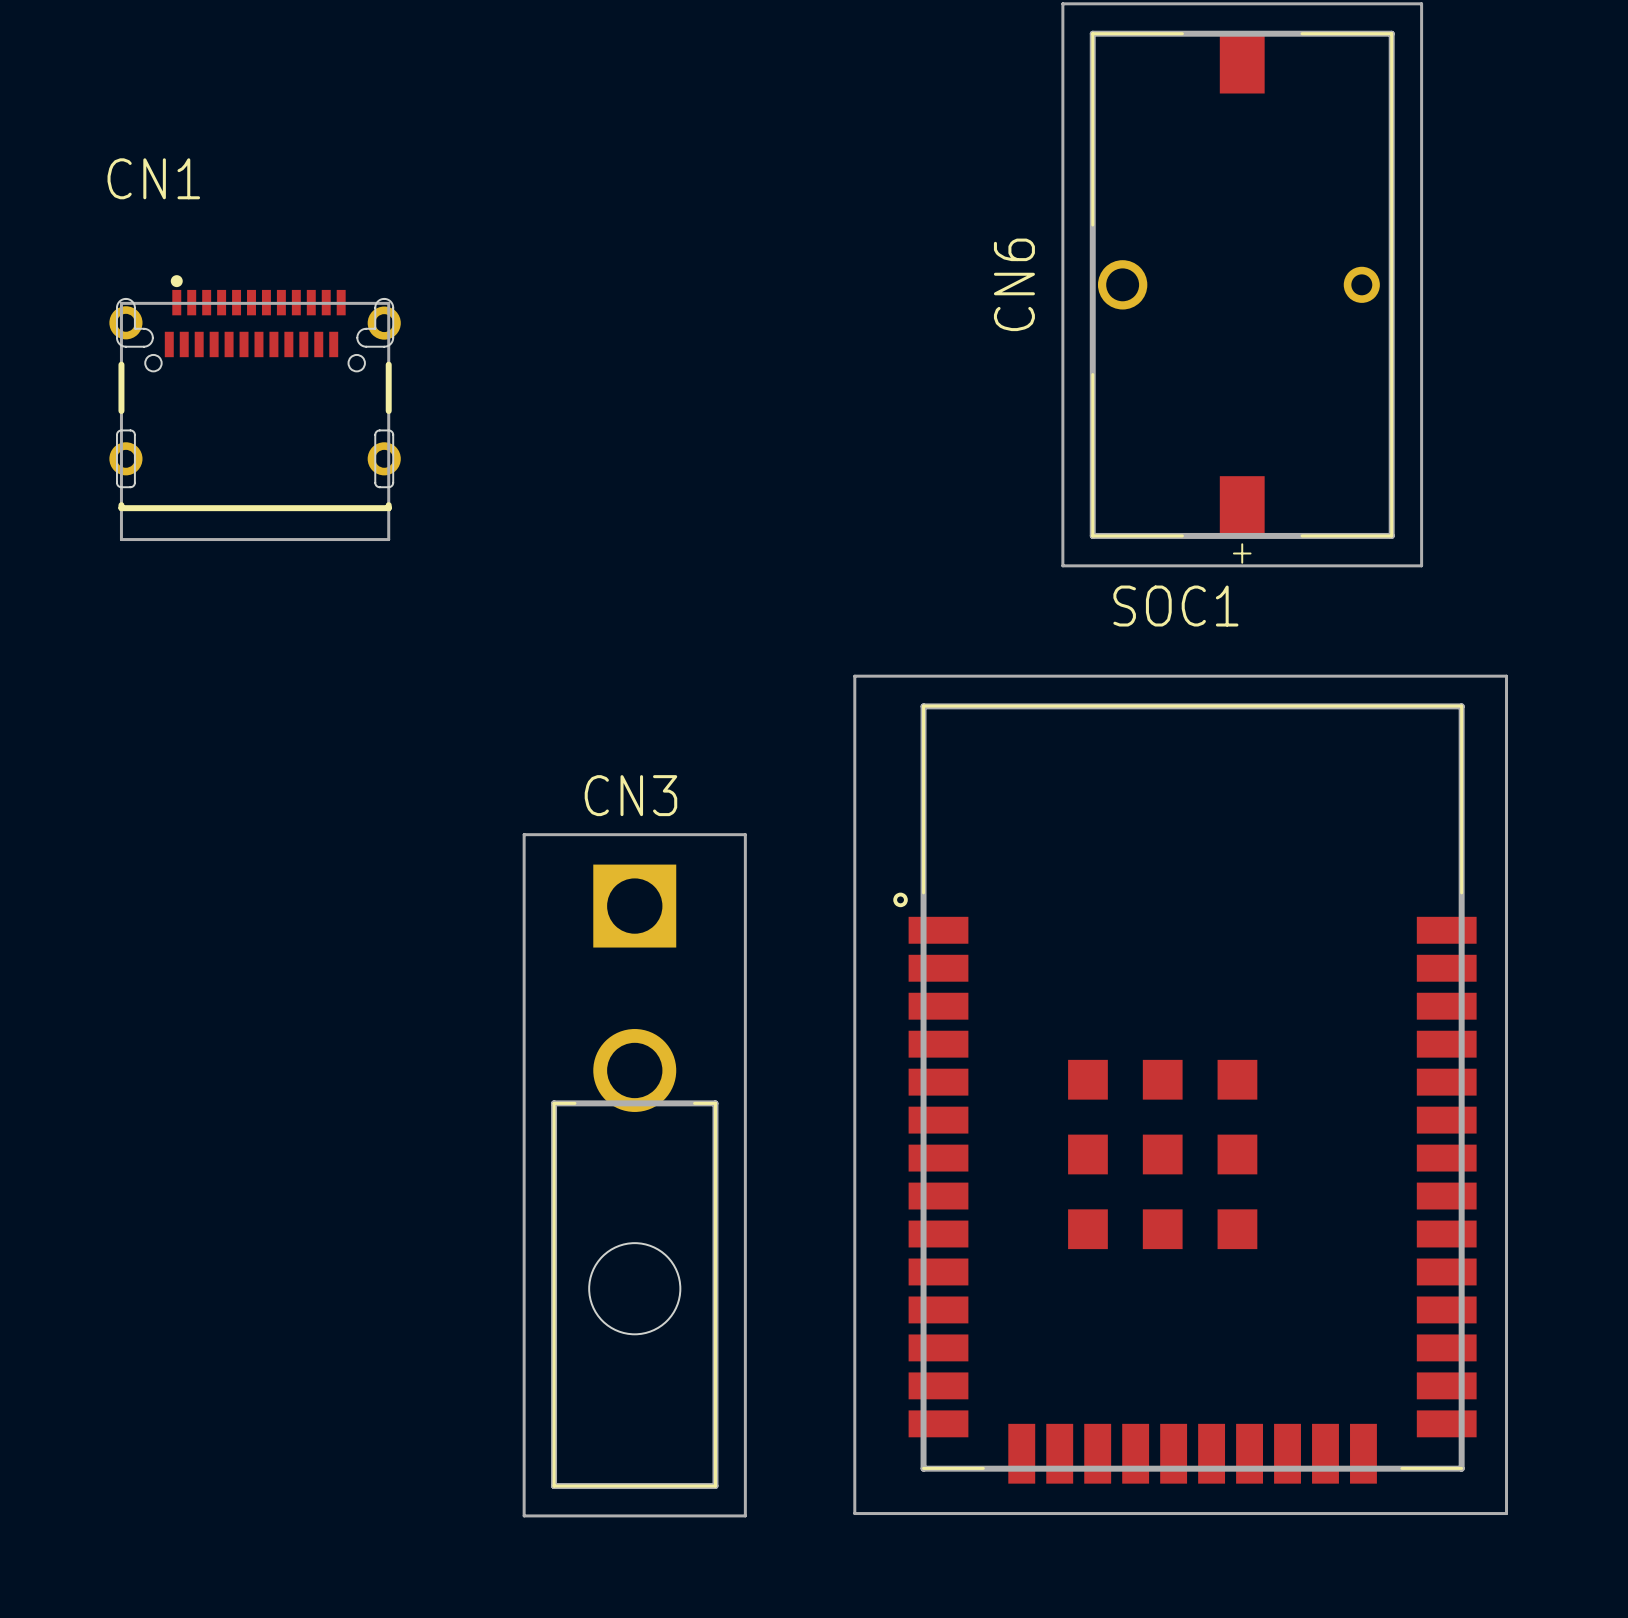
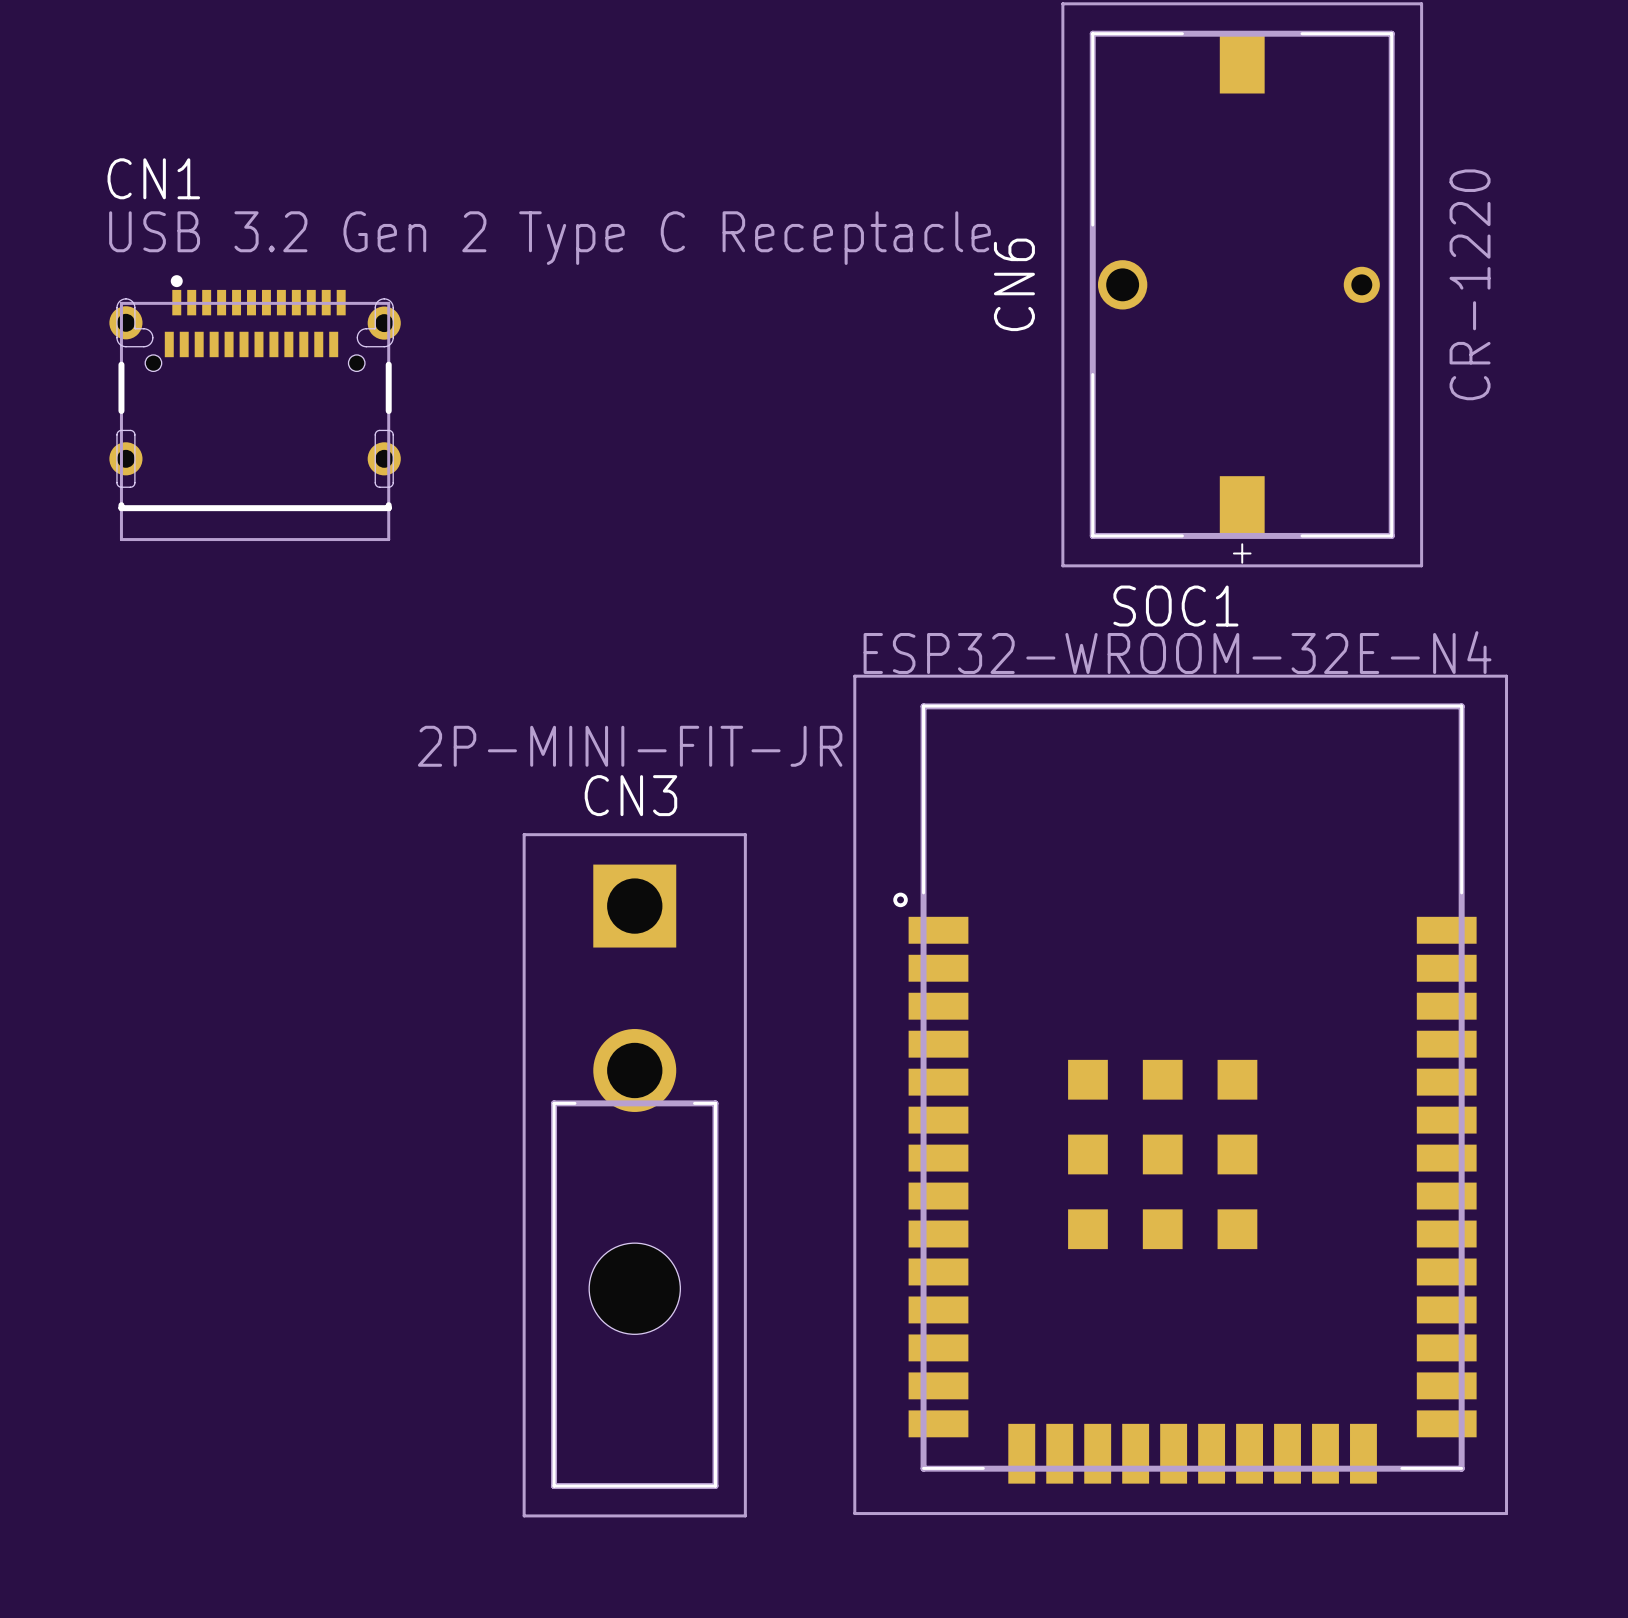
CN1 value: none -> USB 3.2 Gen 2 Type C Receptacle (549, 238)
CN6 value: none -> CR-1220 (1470, 284)
SOC1 value: none -> ESP32-WROOM-32E-N4 (1177, 652)
CN3 value: none -> 2P-MINI-FIT-JR (630, 746)

